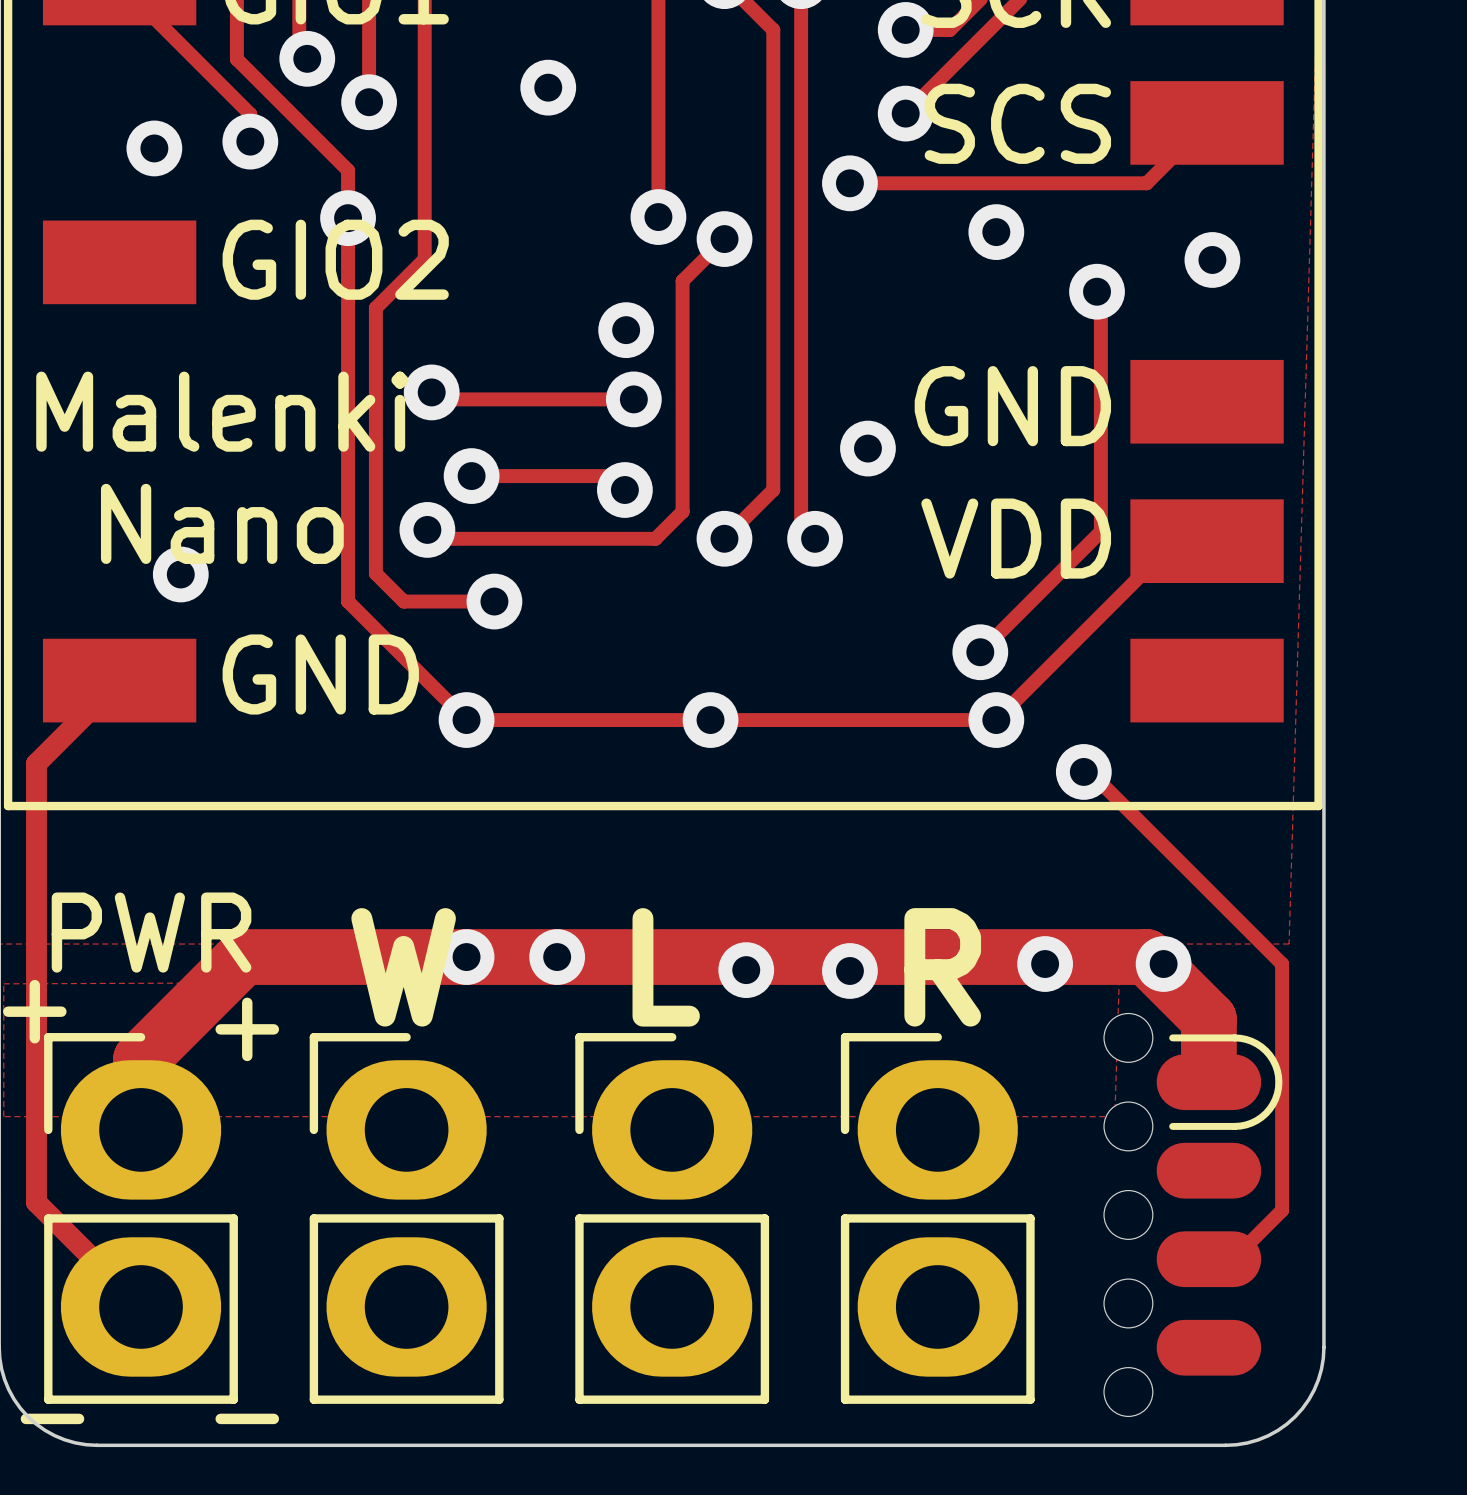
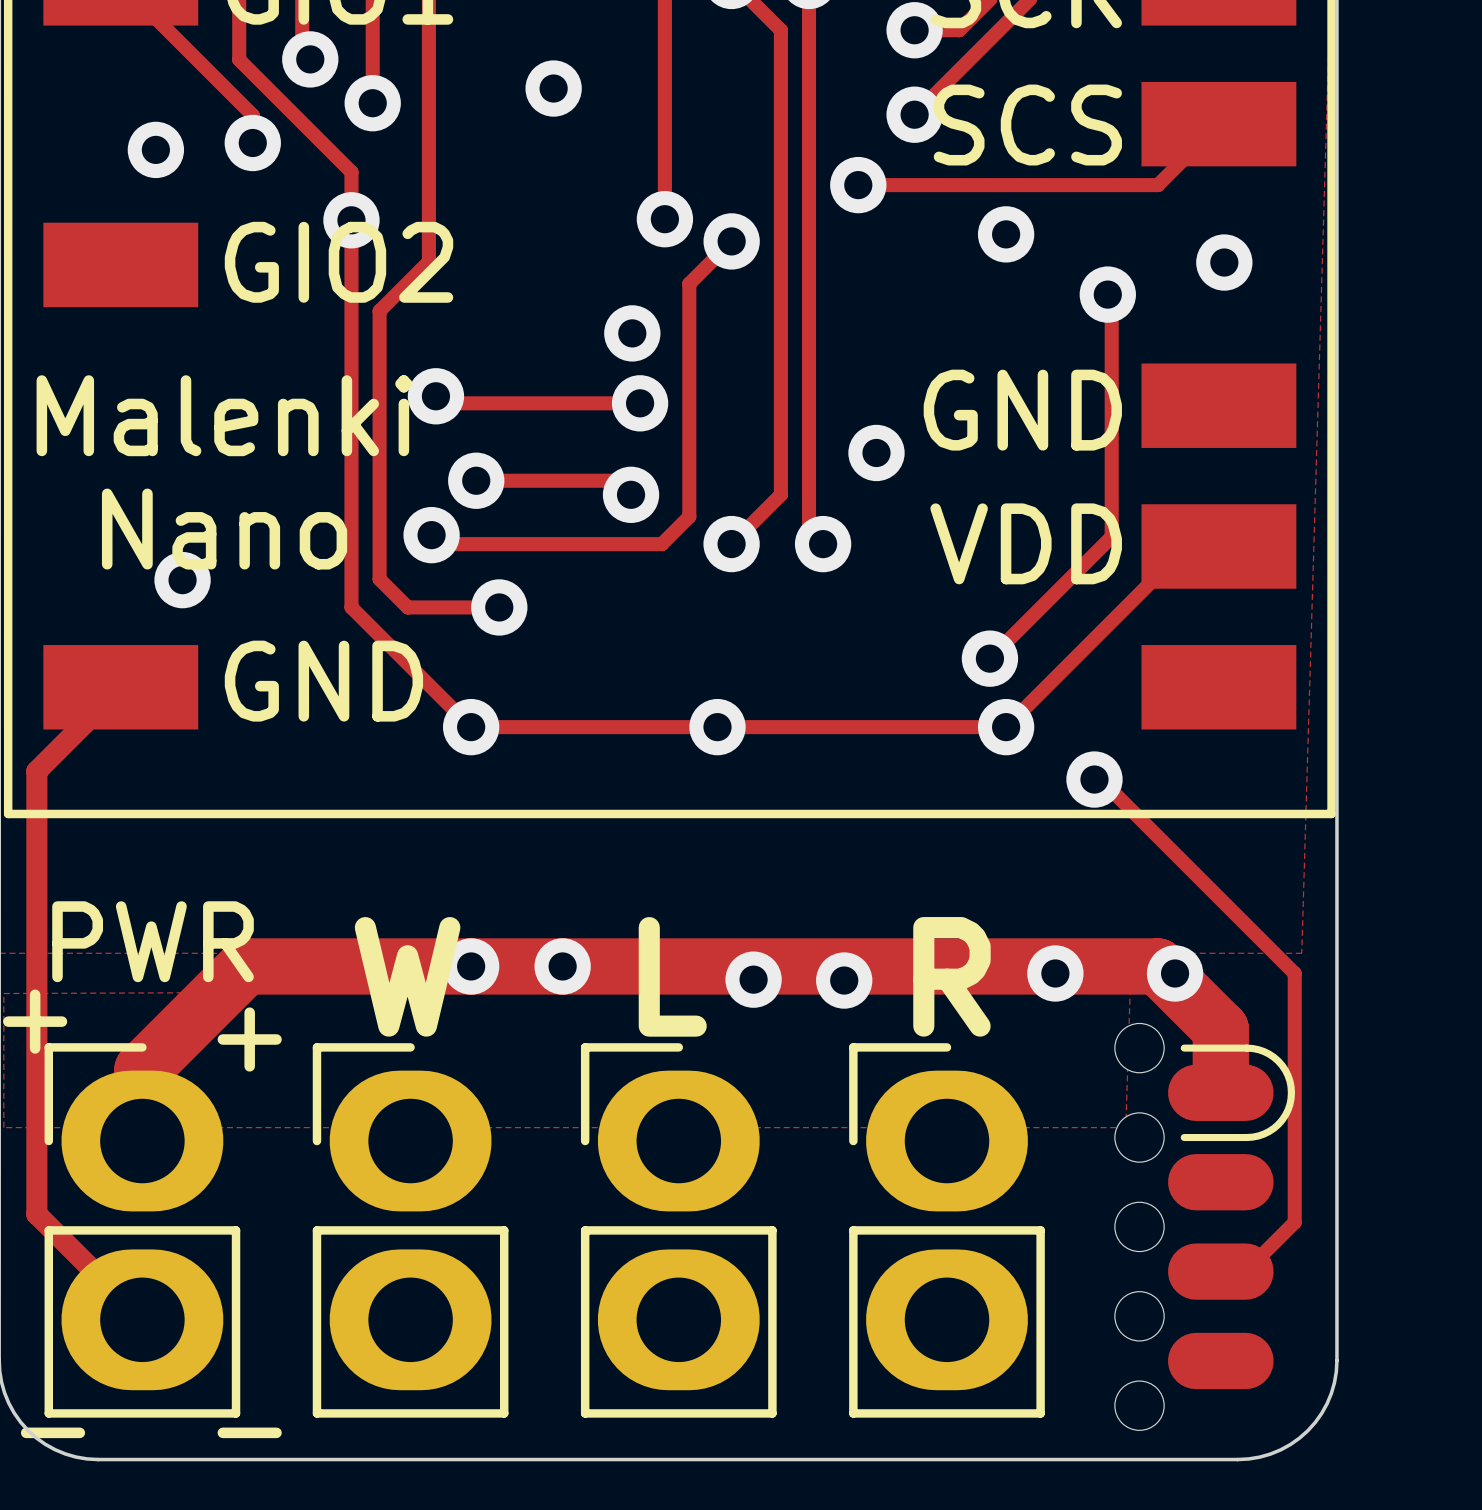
via position: (849, 970) -> (844, 980)

